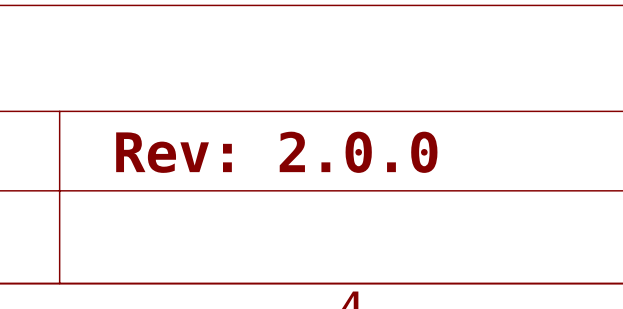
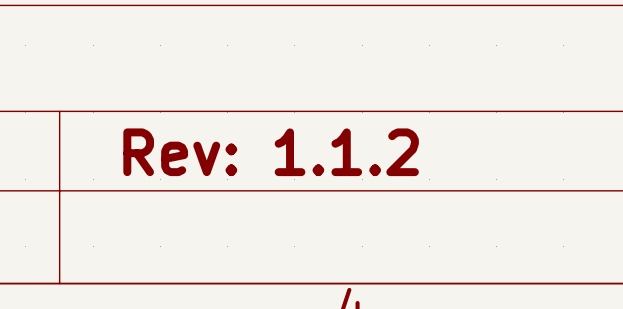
title block: Rev: 2.0.0 (276, 152) -> Rev: 1.1.2 (271, 152)

